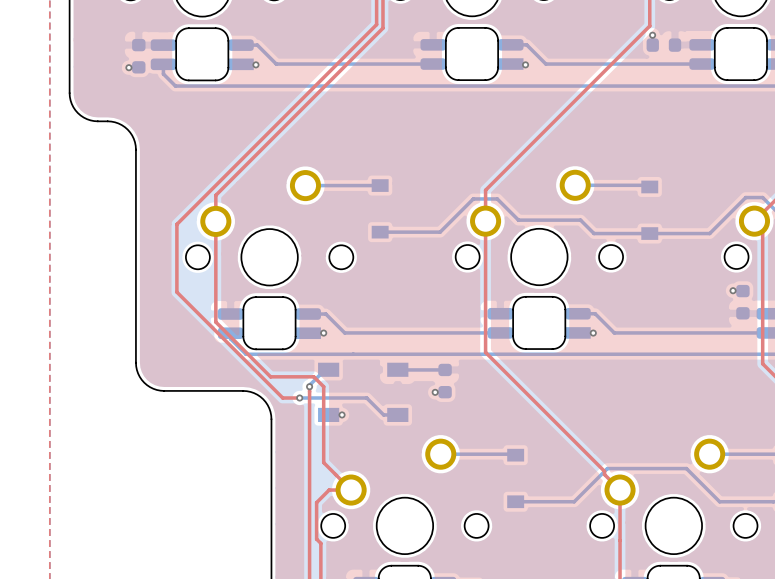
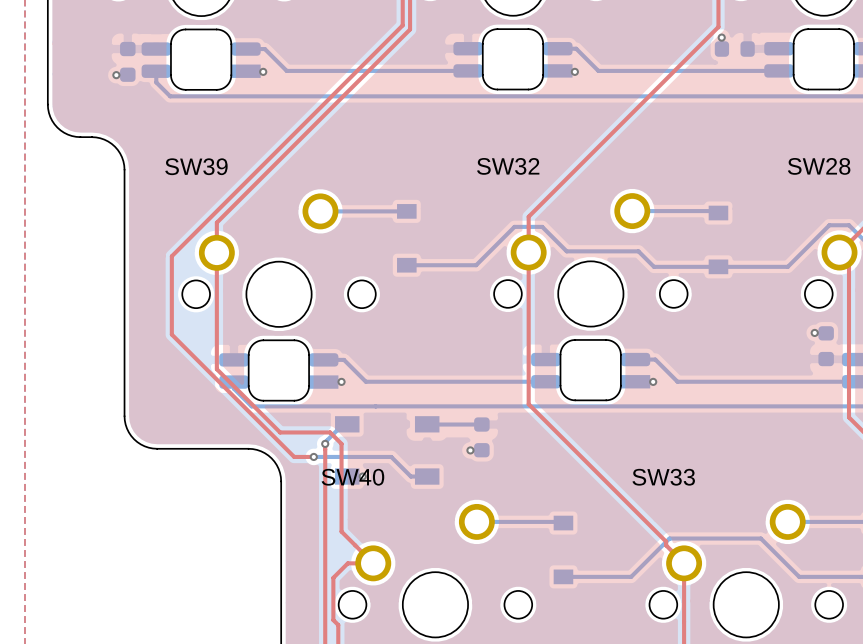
SW39 name: none -> SW39 (196, 166)
SW32 name: none -> SW32 (508, 166)
SW28 name: none -> SW28 (819, 166)
SW40 name: none -> SW40 (352, 477)
SW33 name: none -> SW33 (663, 477)

